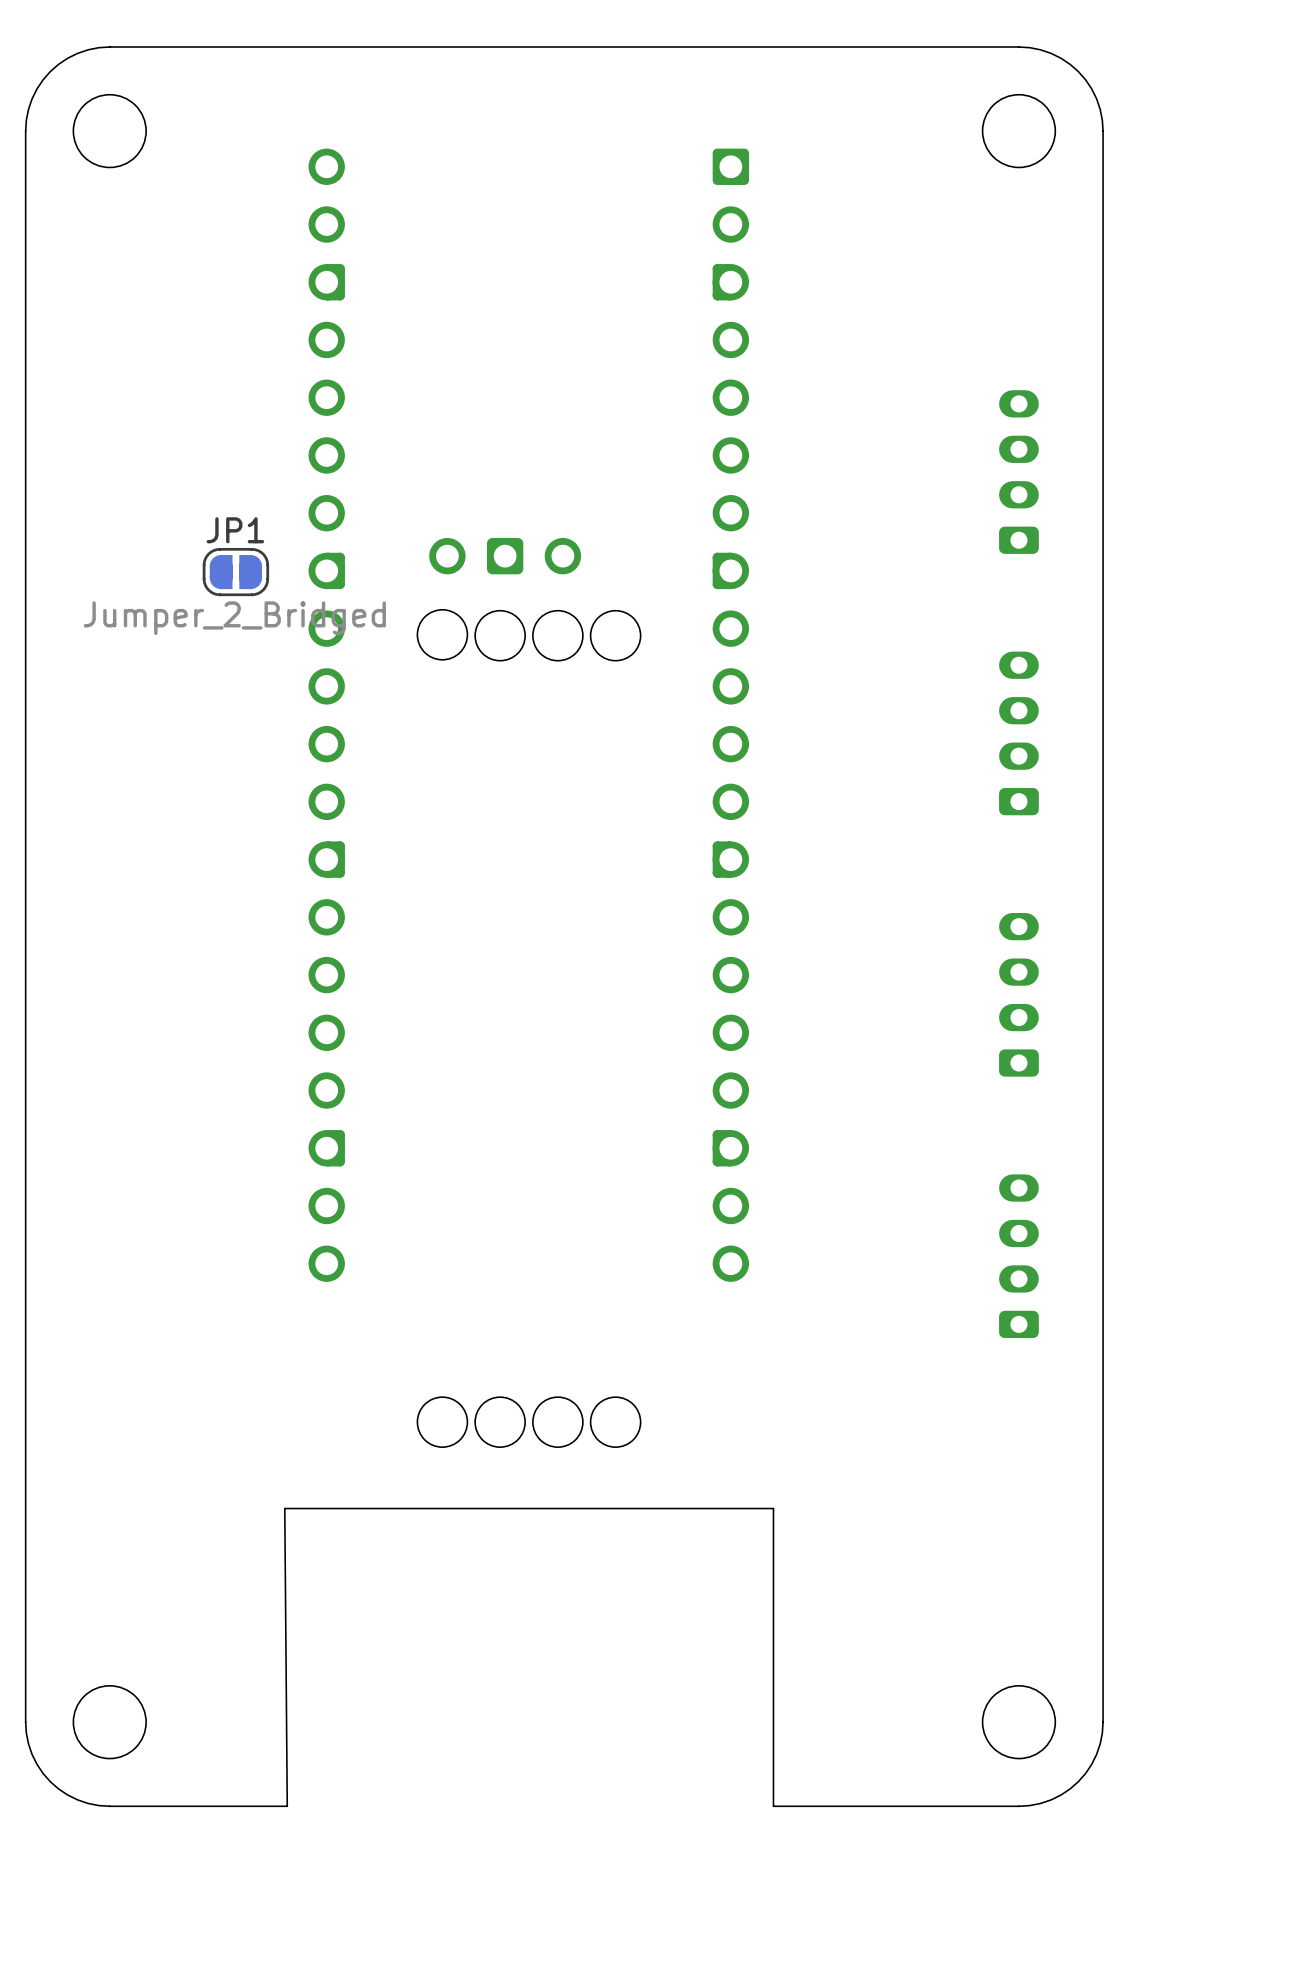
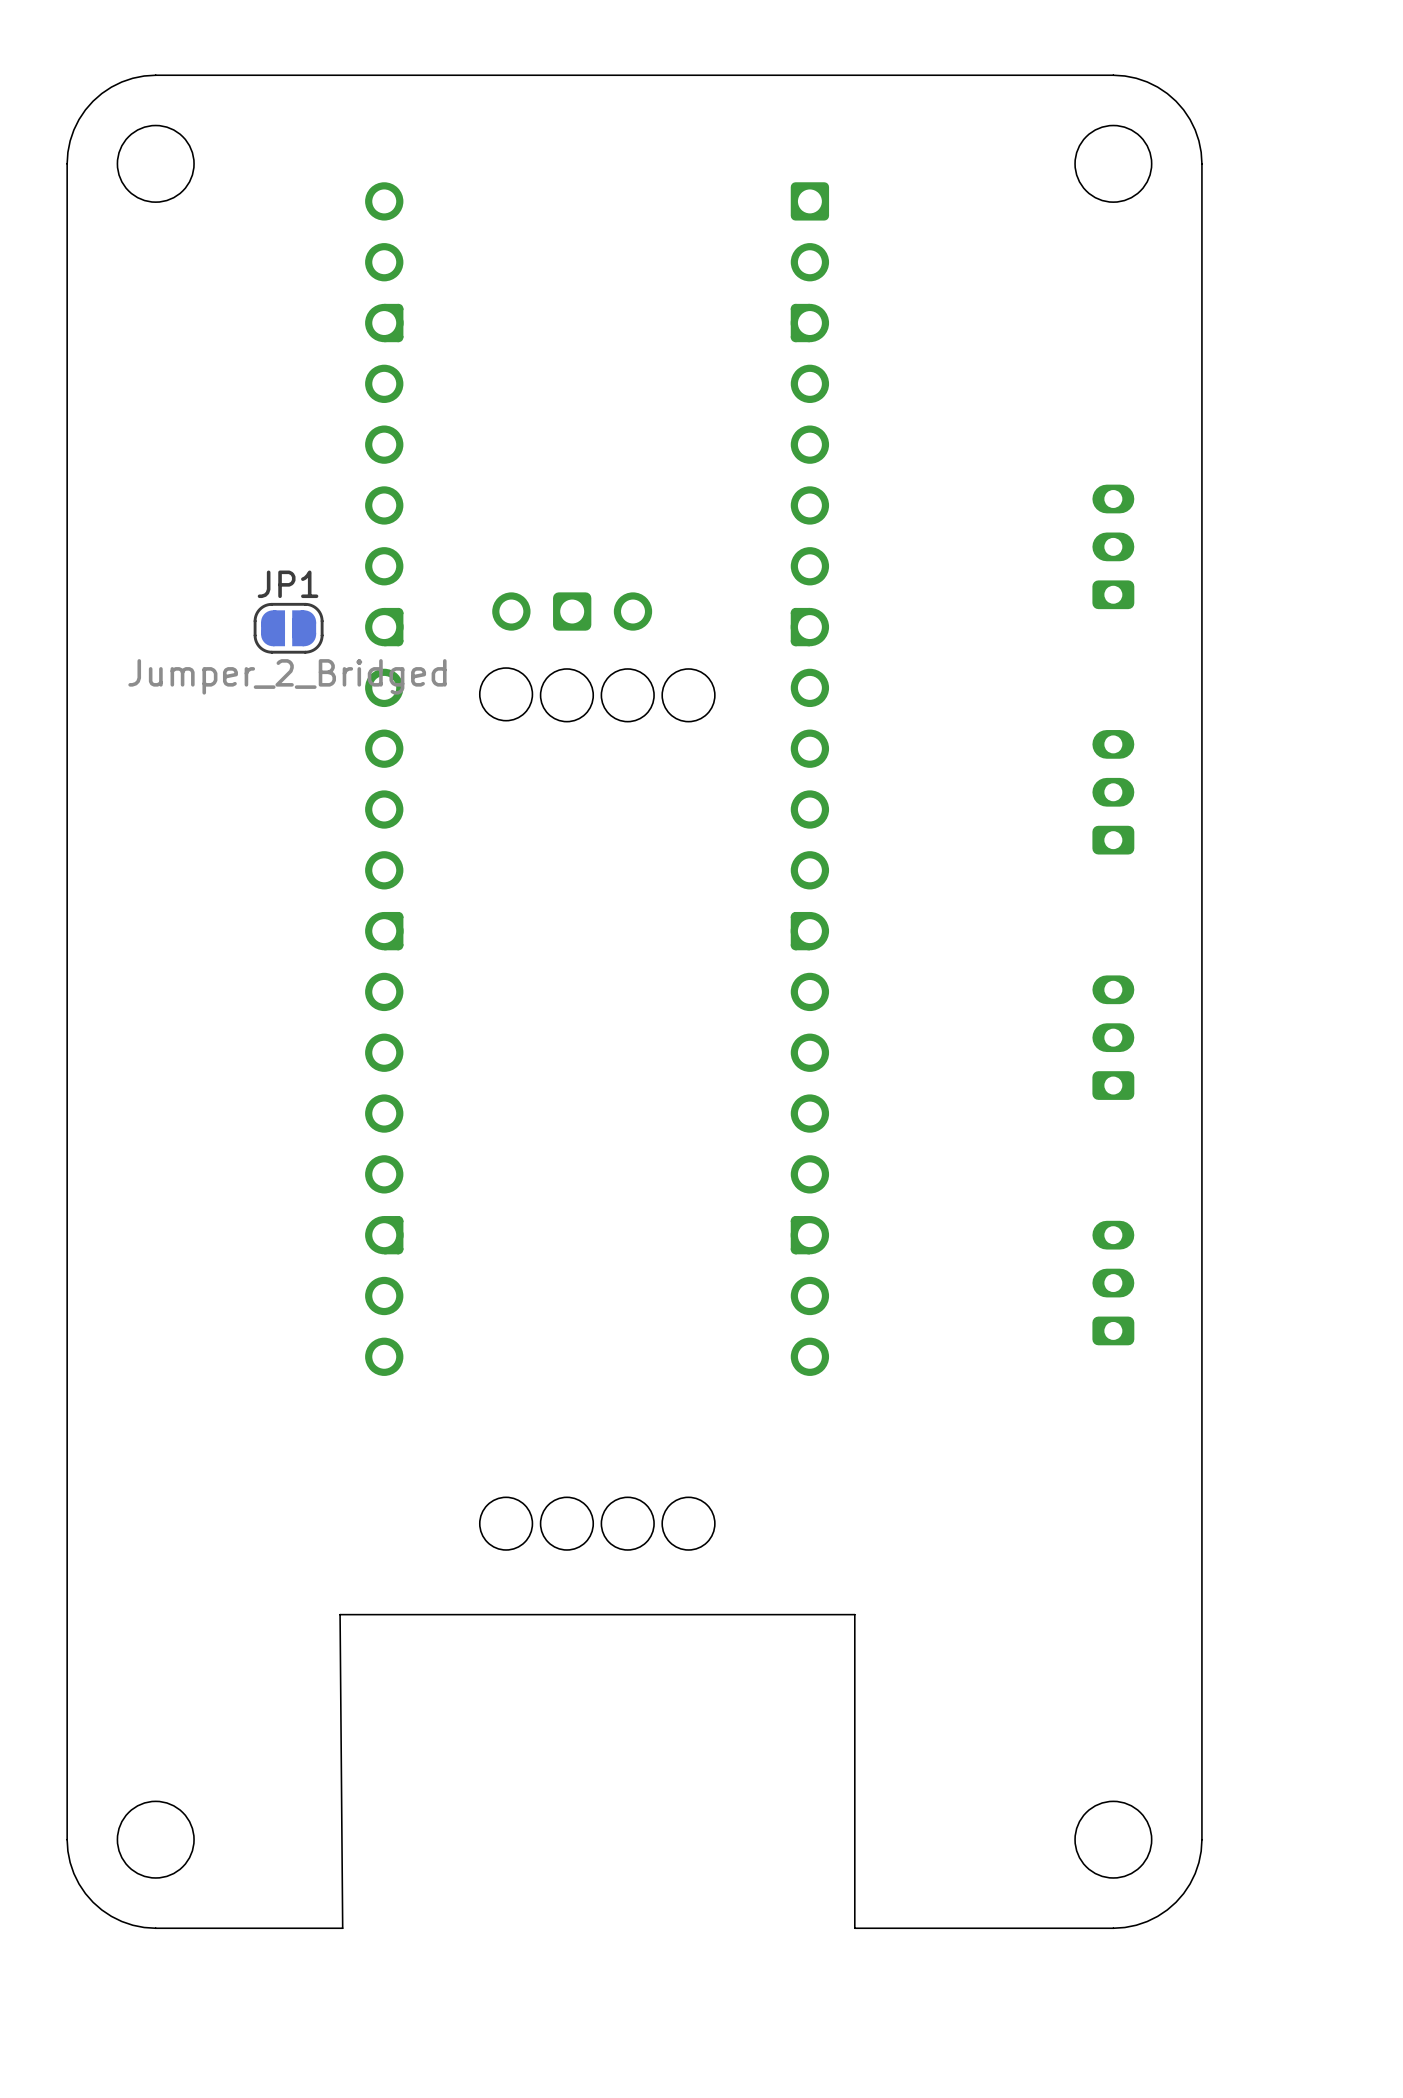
part footprint: [999, 390, 1039, 554] -> [1092, 484, 1135, 610]
part footprint: [999, 651, 1039, 816] -> [1092, 730, 1135, 855]
part: none -> (1113, 1037)
part: (1018, 994) -> none
part: none -> (1113, 1283)
part: (1018, 1256) -> none

